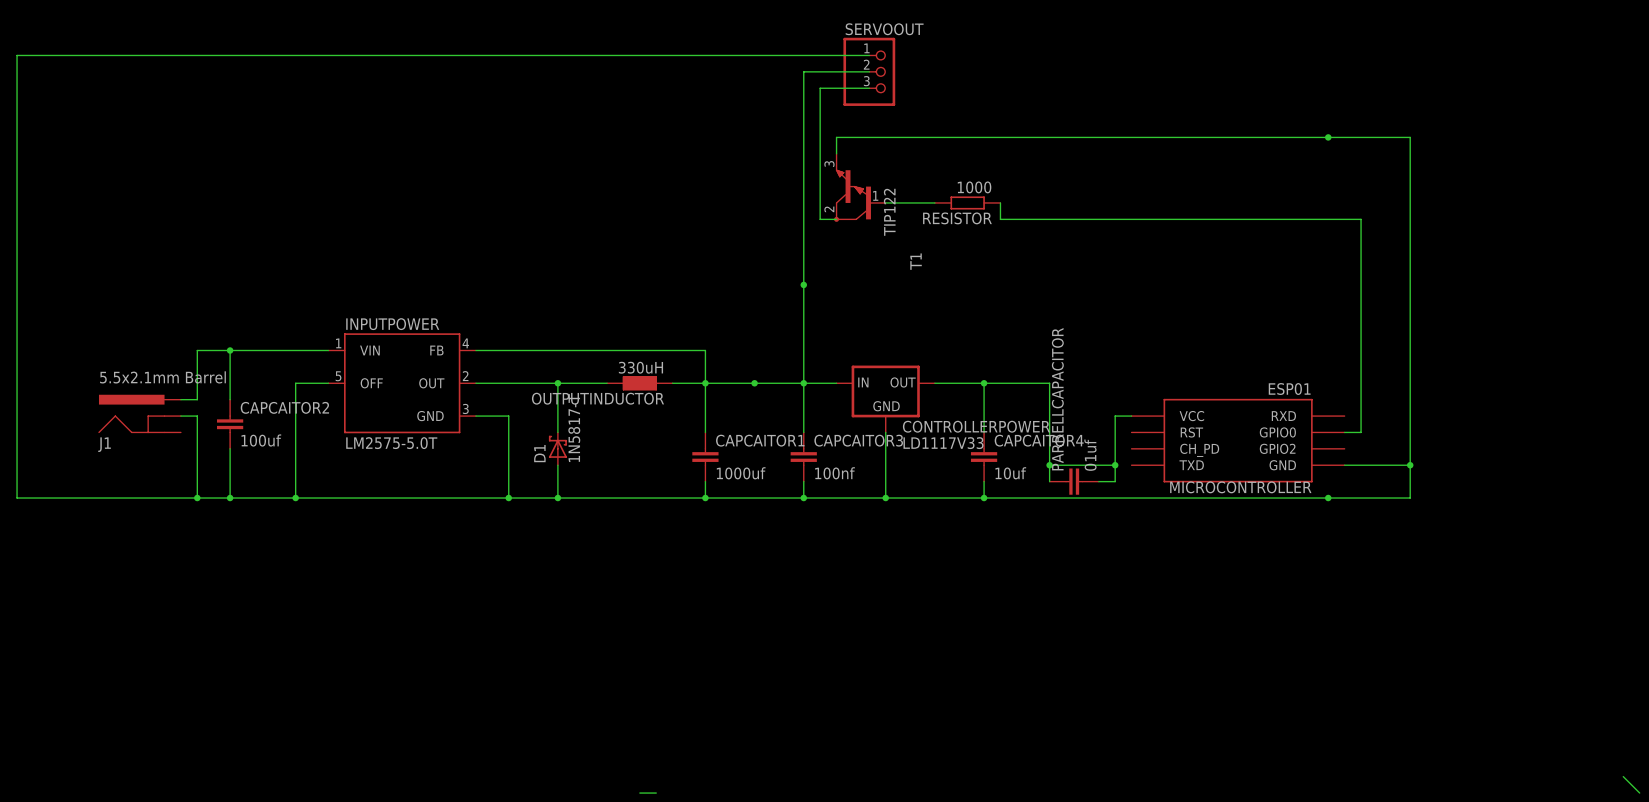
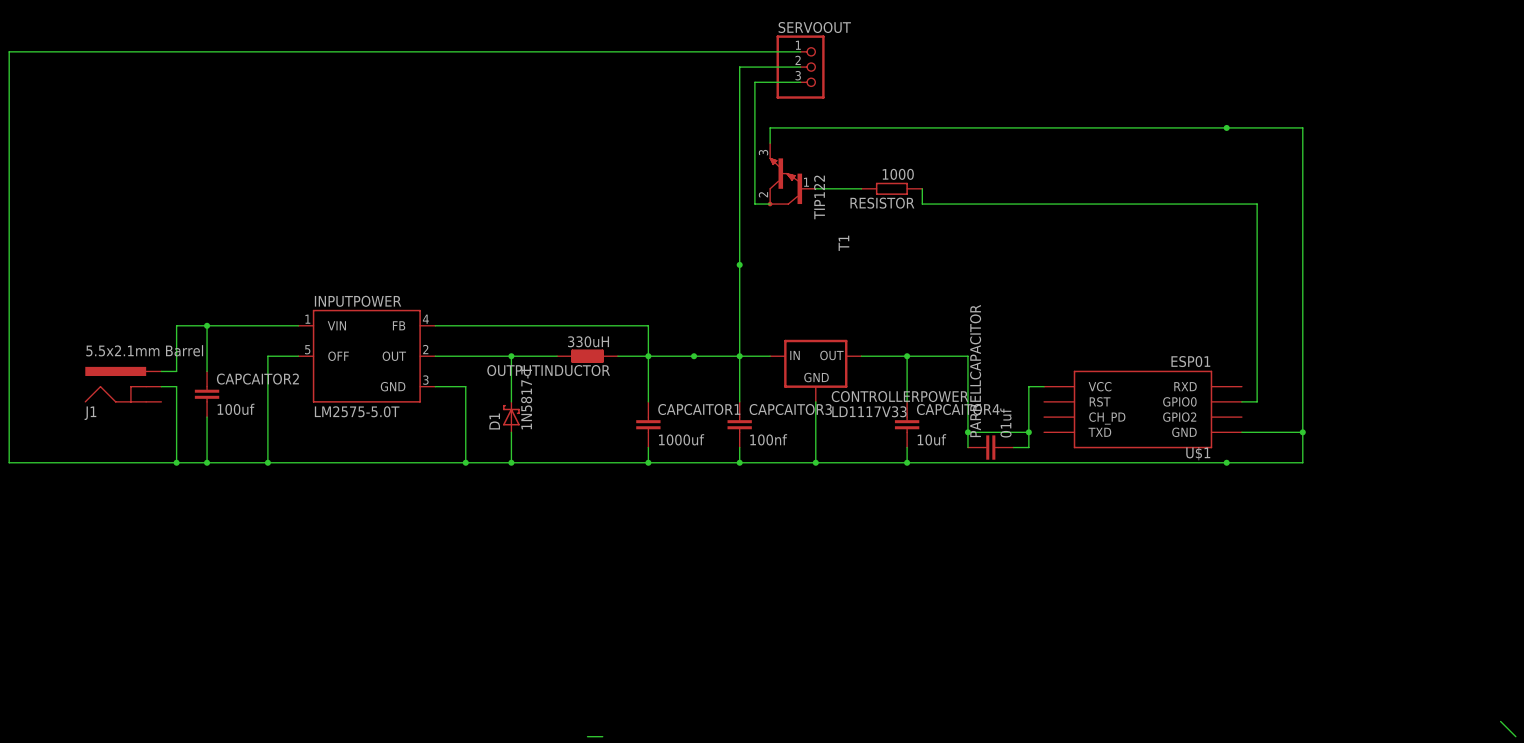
MICROCONTROLLER name: MICROCONTROLLER (1240, 487) -> U$1 (1198, 453)

